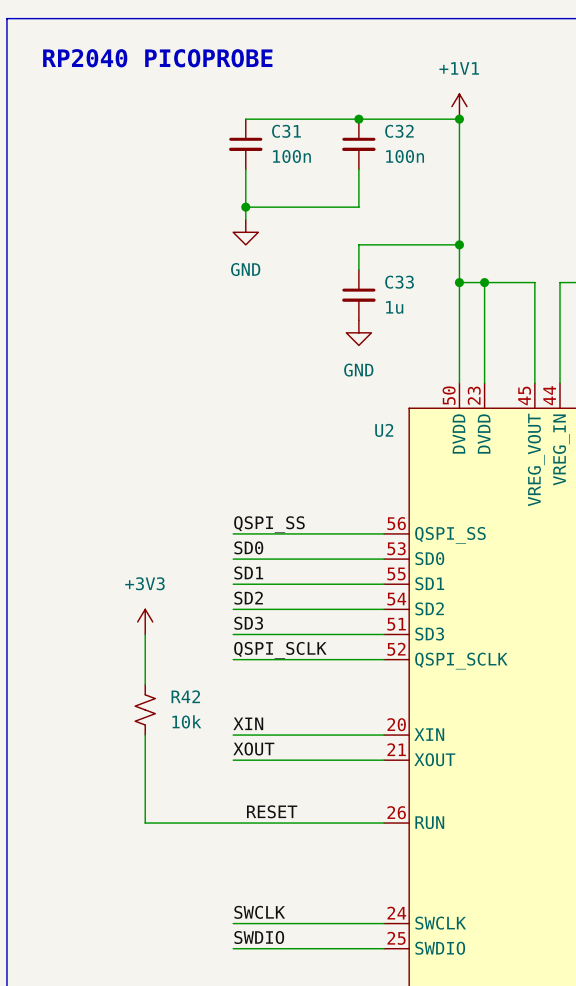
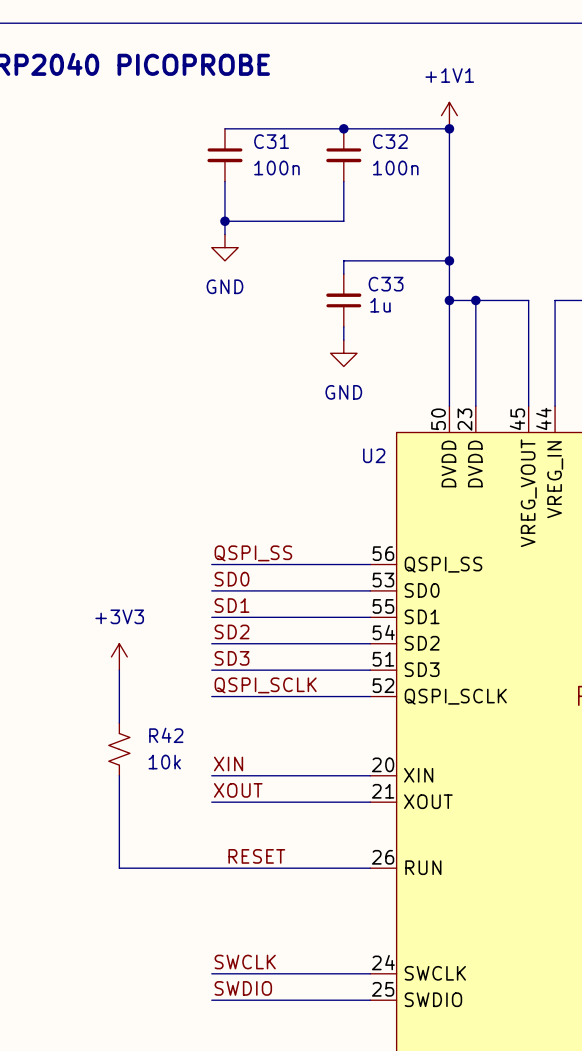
C33 rotation: 0° (358, 295) -> 180° (343, 300)

